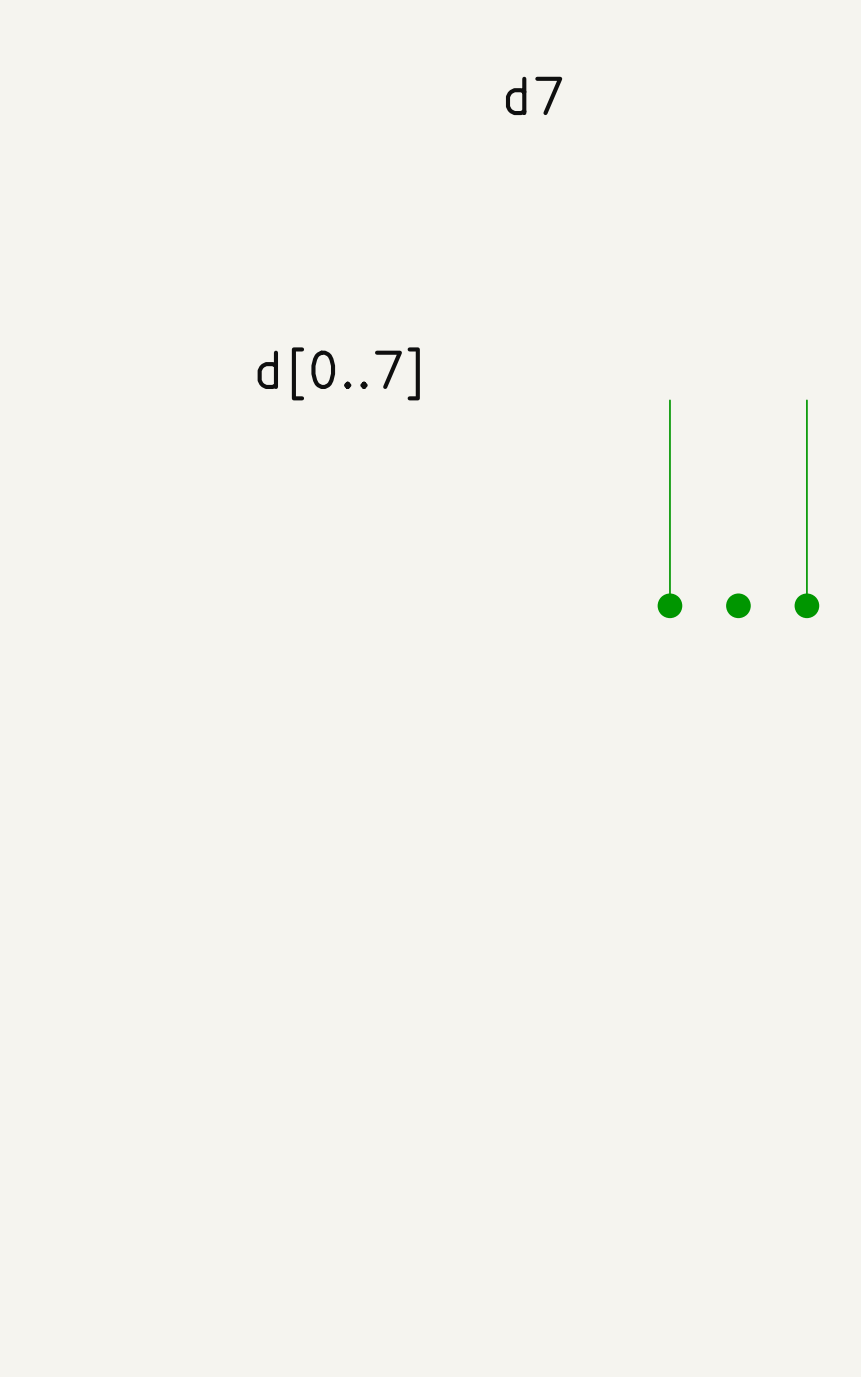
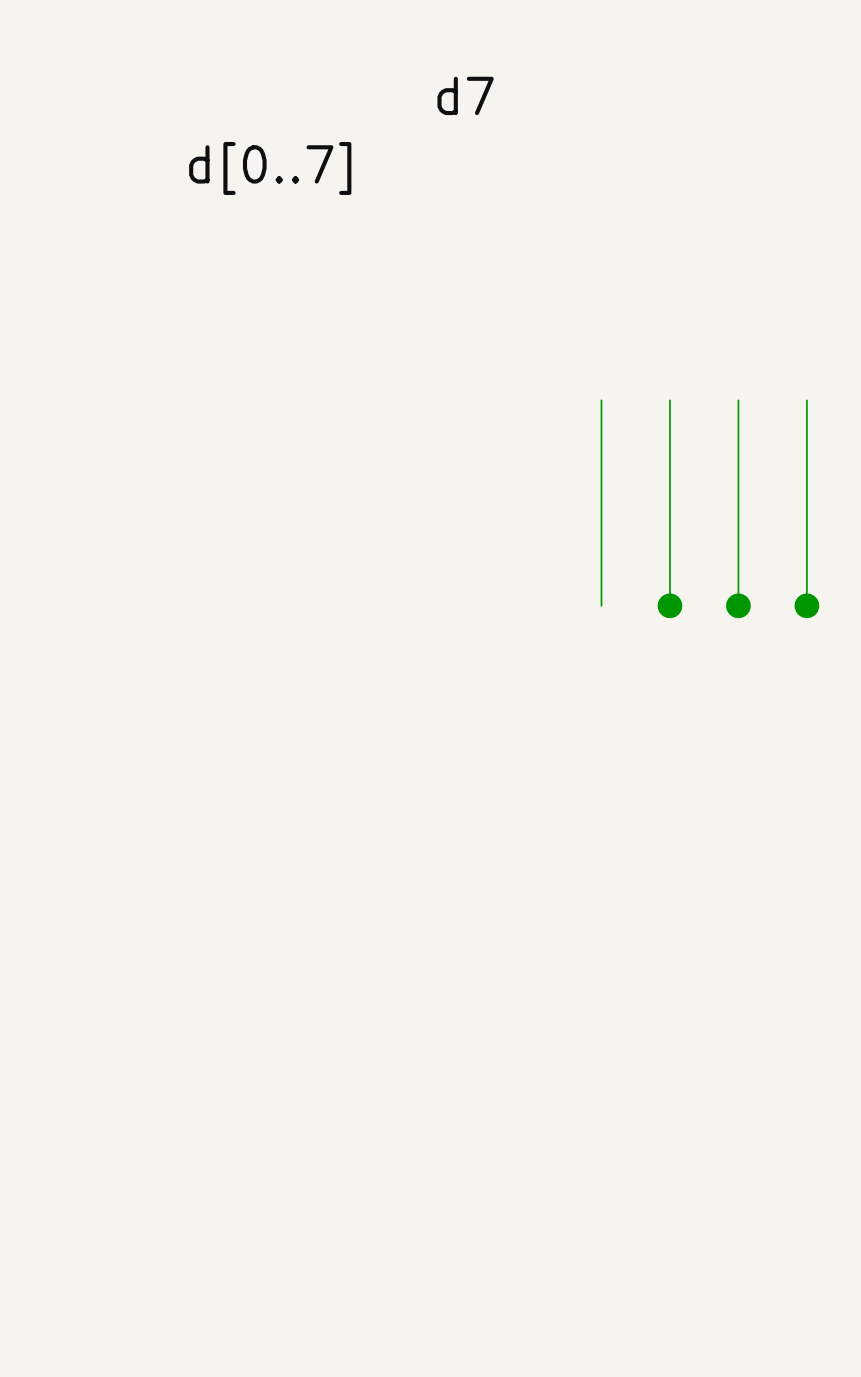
label position: d7 (534, 95) -> d7 (465, 95)
label position: d[0..7] (338, 373) -> d[0..7] (270, 168)
wire: none -> (601, 400) (601, 605)
wire: none -> (738, 400) (738, 605)

